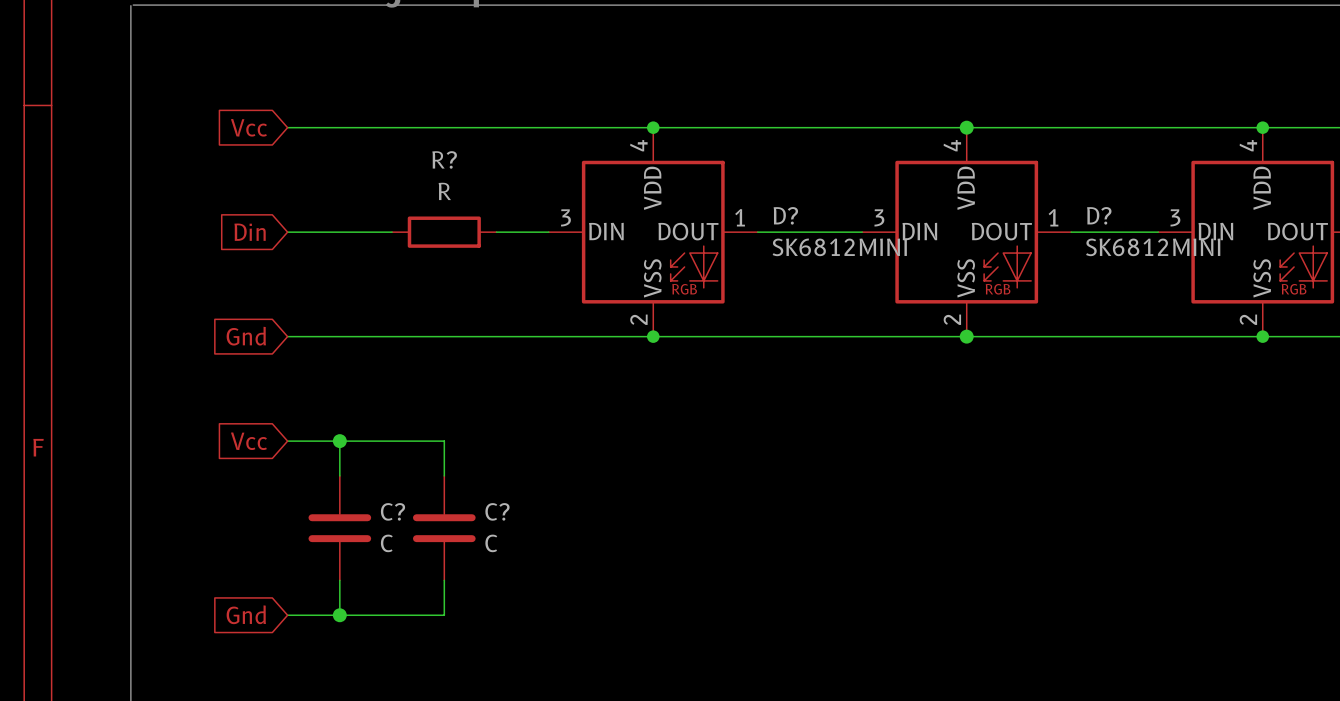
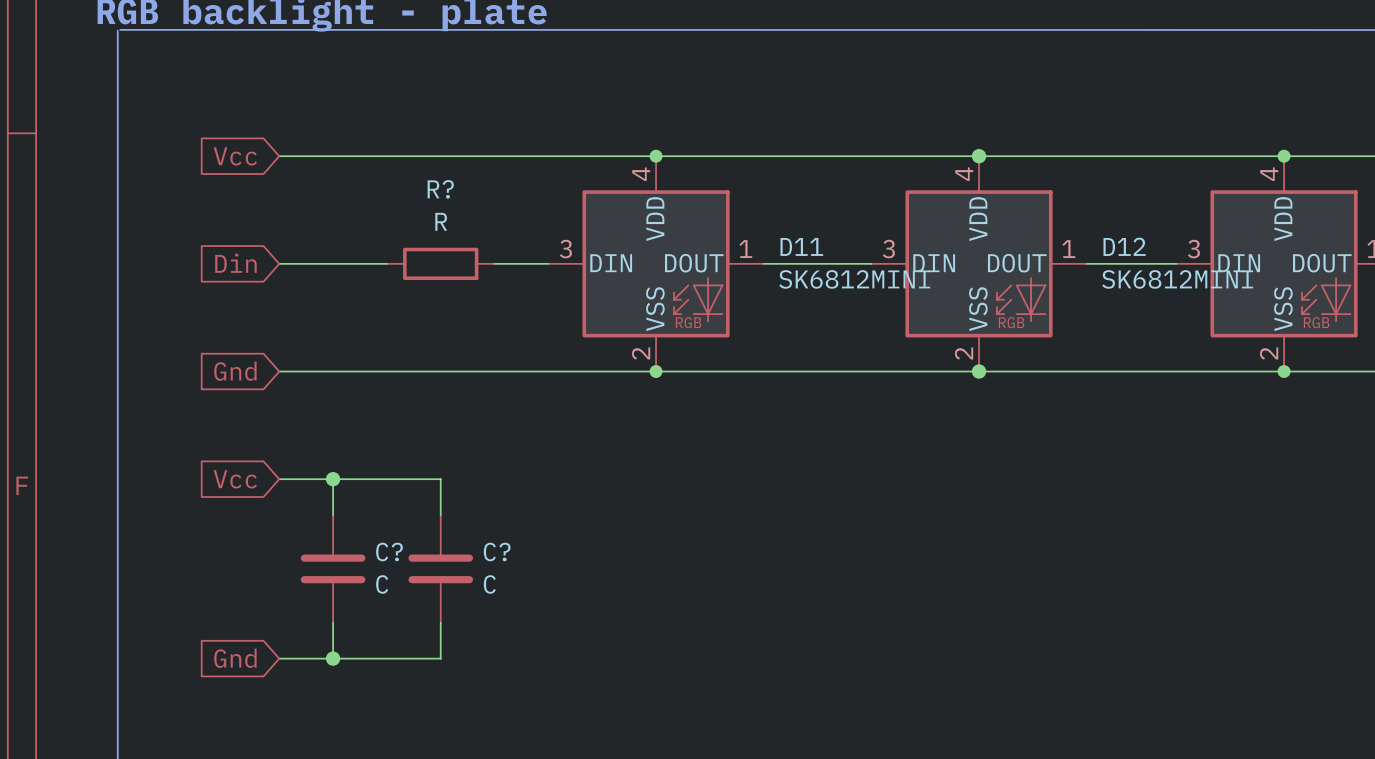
D? name: D? (785, 215) -> D11 (801, 246)
D? name: D? (1099, 215) -> D12 (1124, 246)

